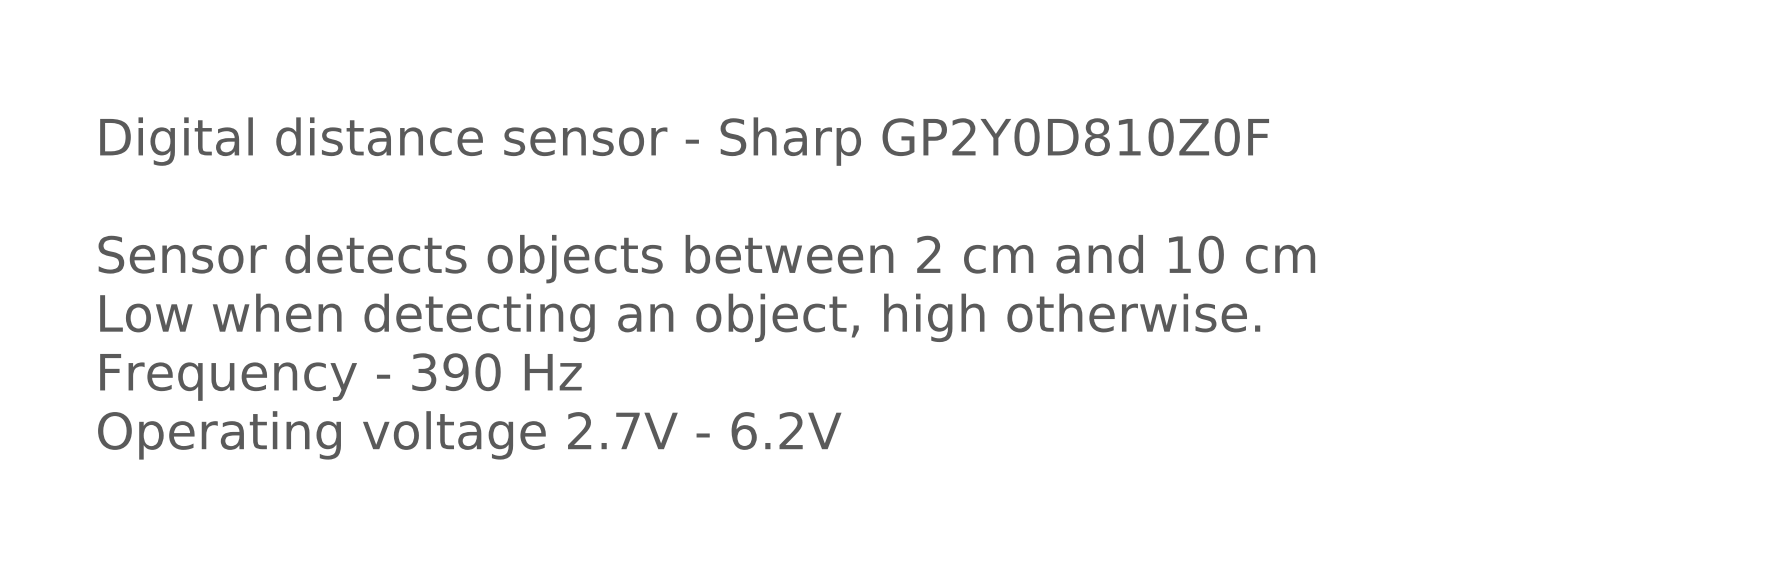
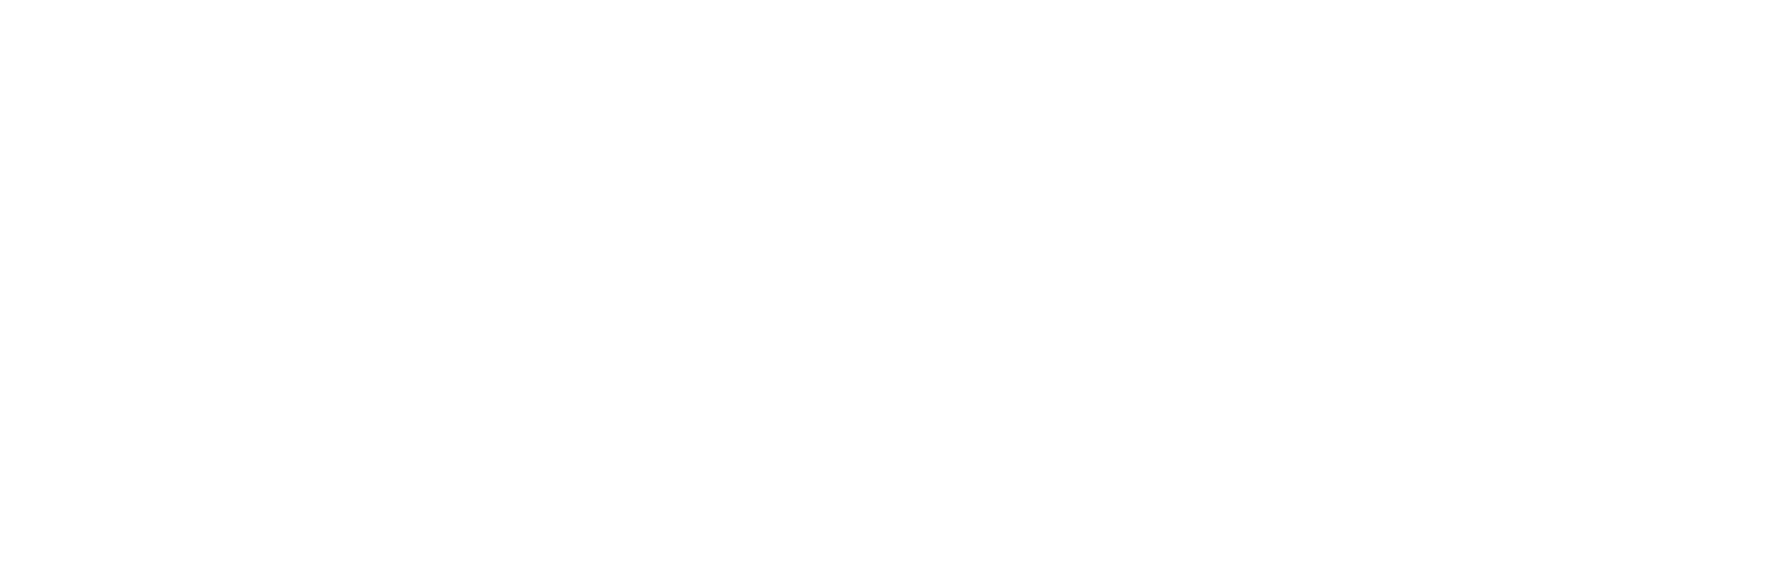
text: Digital distance sensor - Sharp GP2Y0D810Z0F (684, 141) -> none
text: Sensor detects objects between 2 cm and 10 cm (706, 259) -> none
text: Low when detecting an object, high otherwise. (680, 317) -> none
text: Frequency - 390 Hz (340, 377) -> none
text: Operating voltage 2.7V - 6.2V (469, 435) -> none

